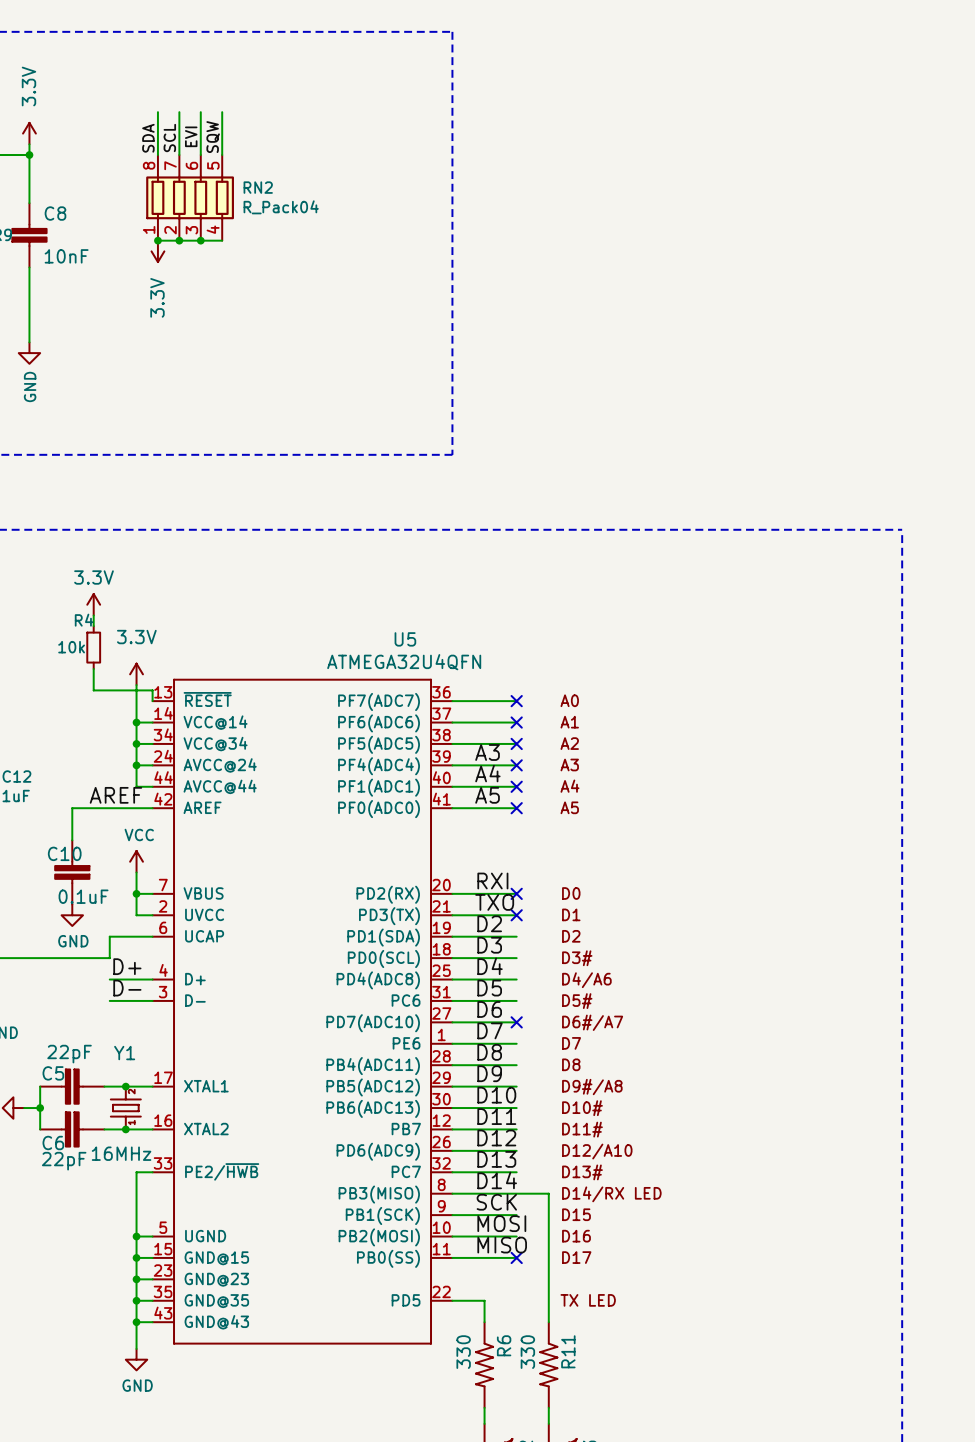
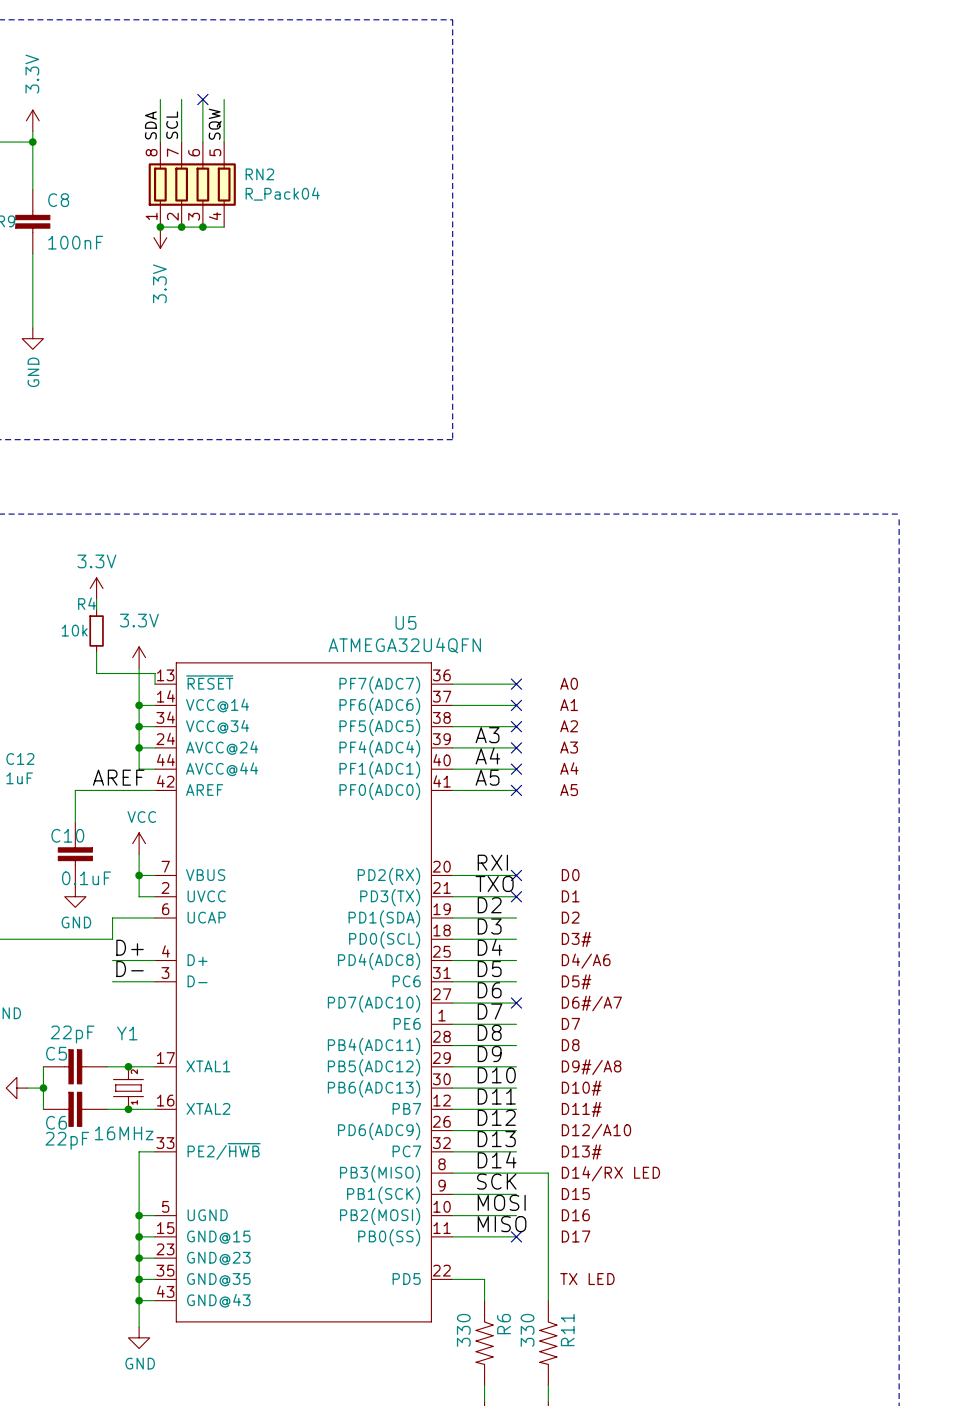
no-connect mark: none -> (202, 99)
label: EVI (191, 136) -> none
C8 value: 10nF (66, 256) -> 100nF (75, 242)

